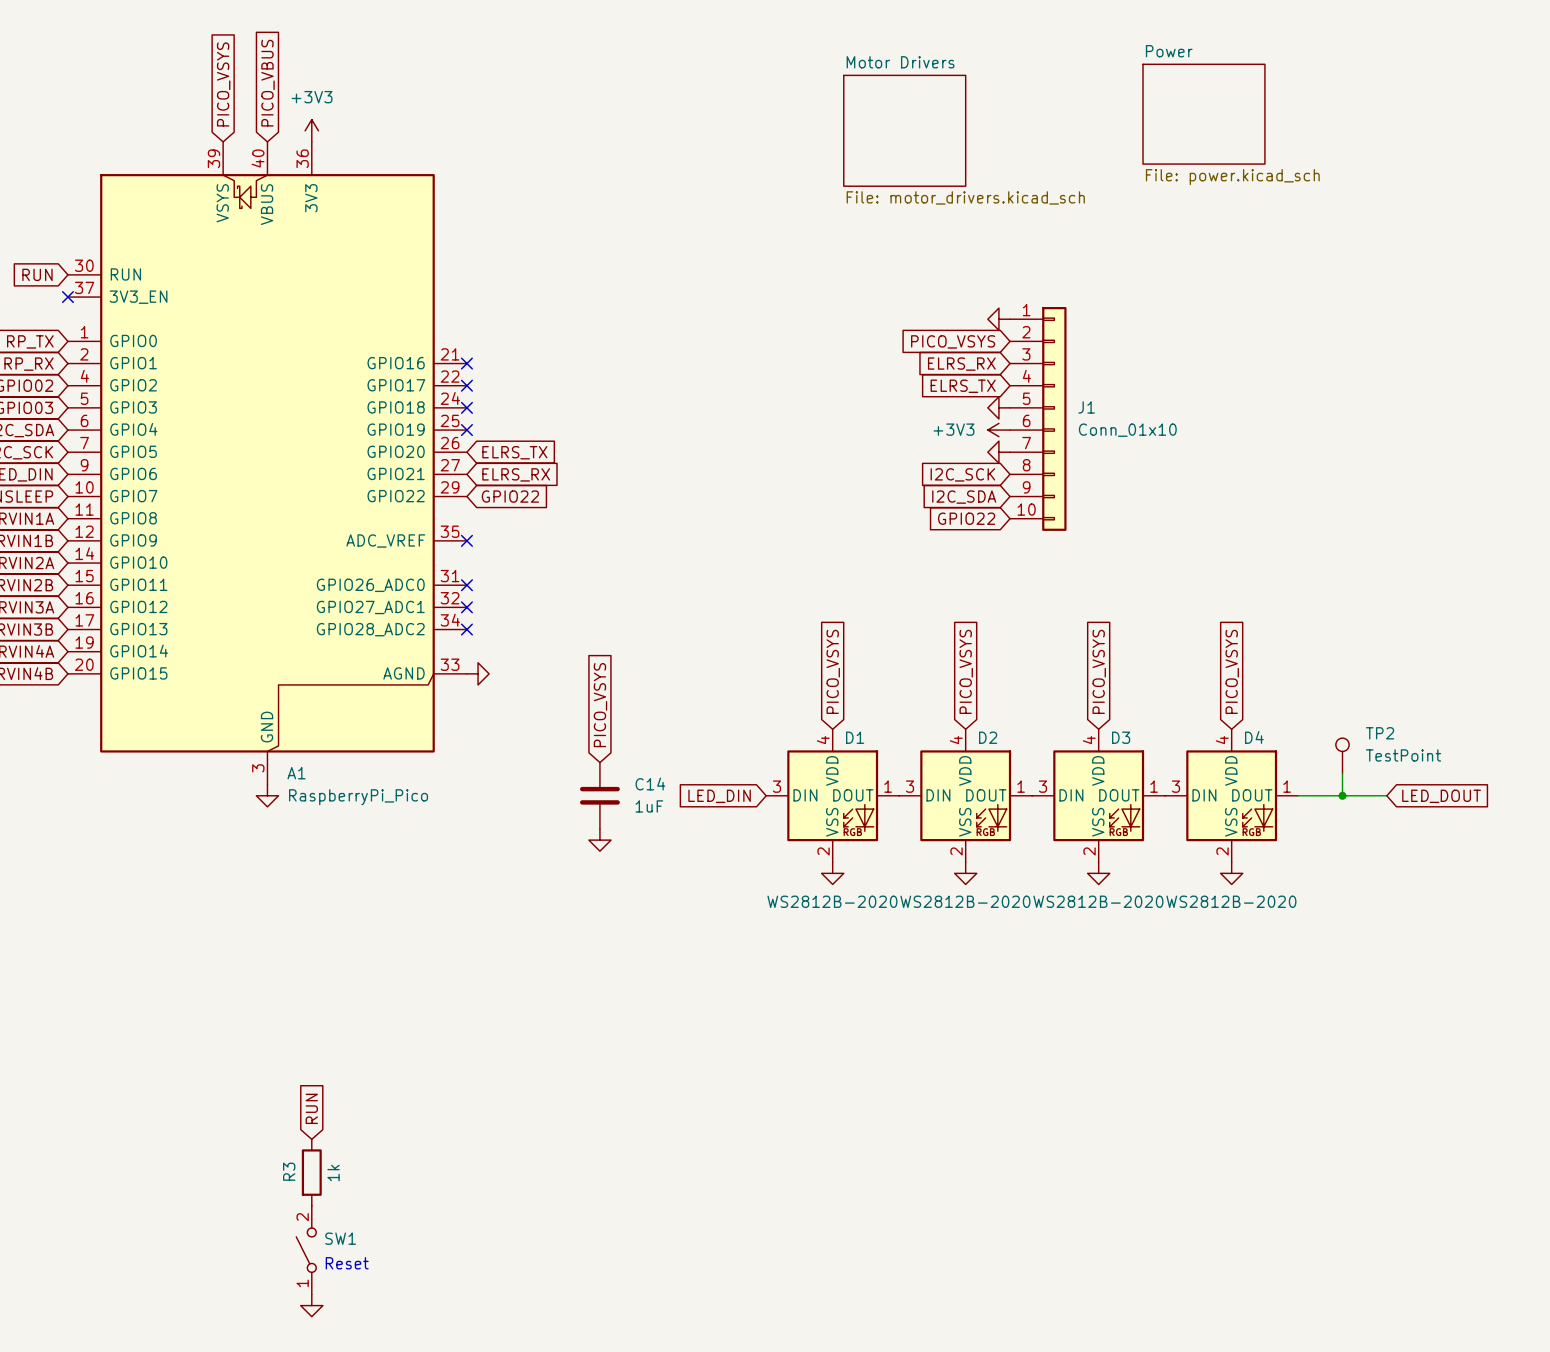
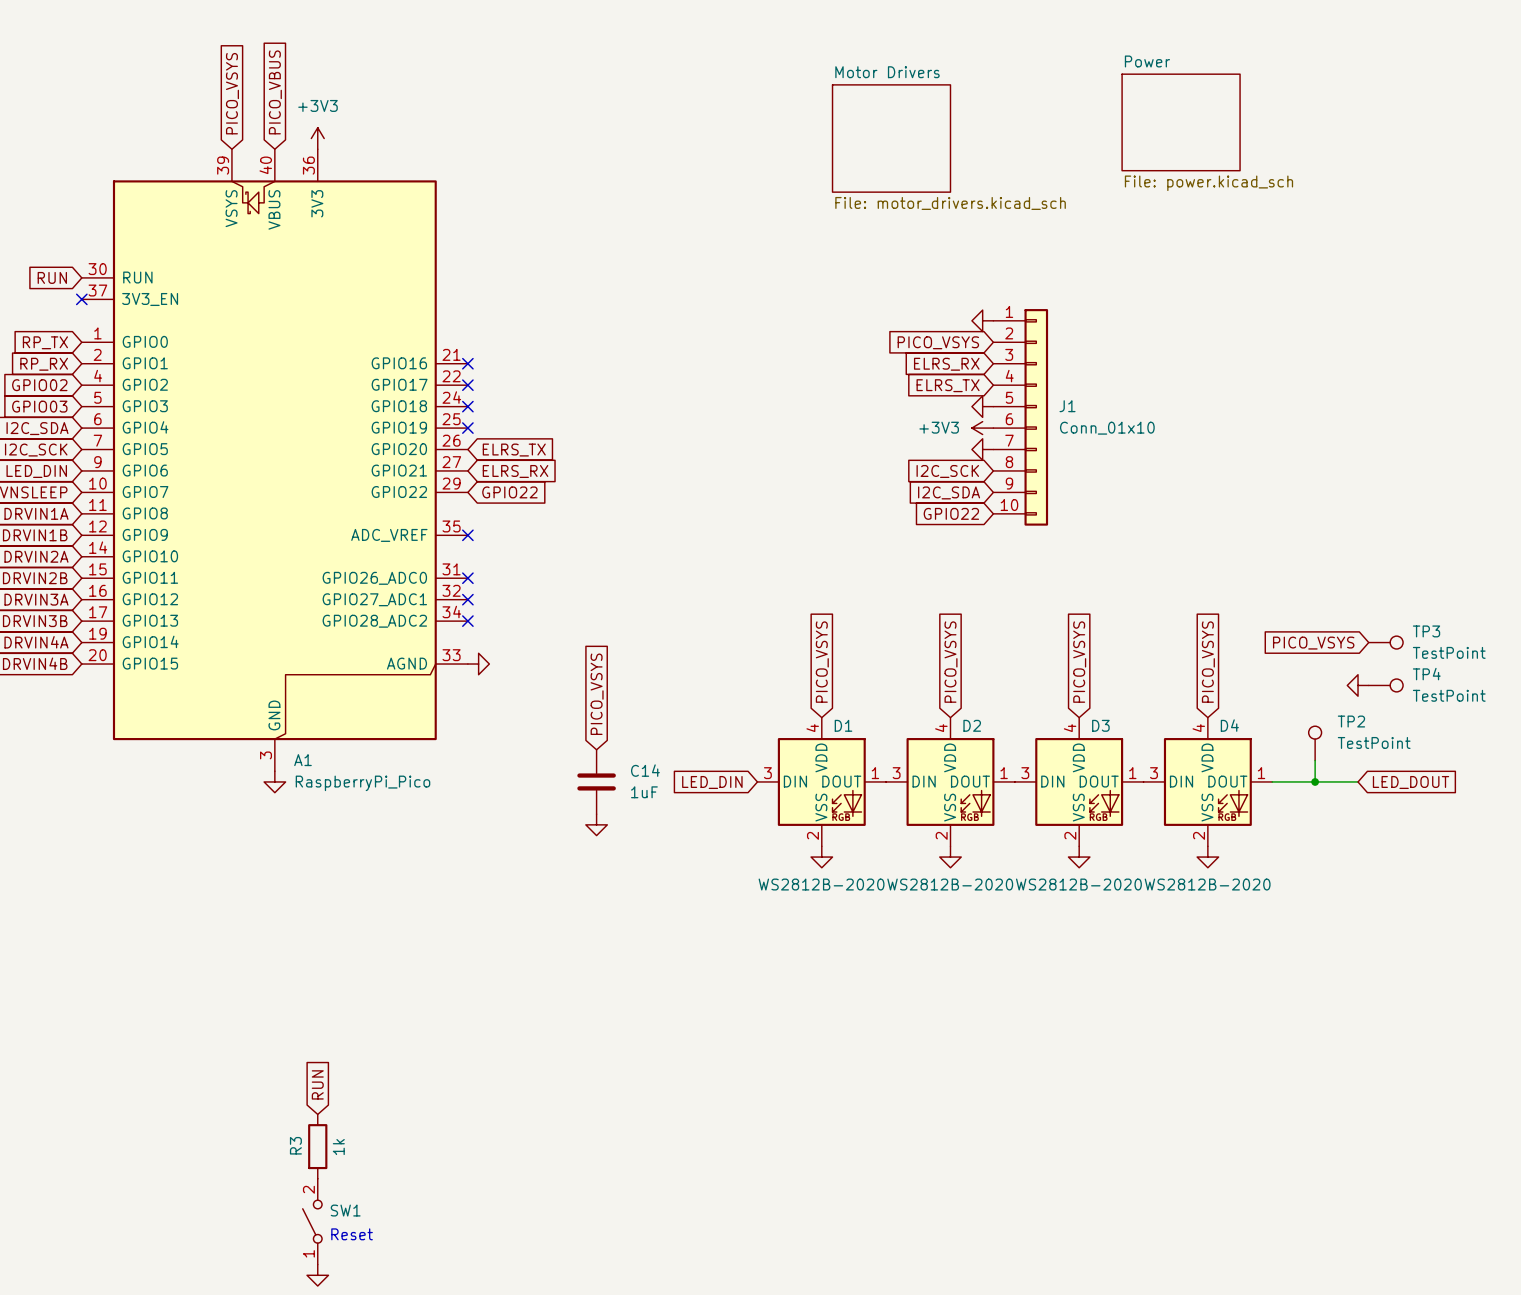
TP3: none -> TestPoint (1385, 642)
global label: none -> PICO_VSYS (1313, 643)
power symbol: none -> (1358, 685)
TP4: none -> TestPoint (1385, 685)

